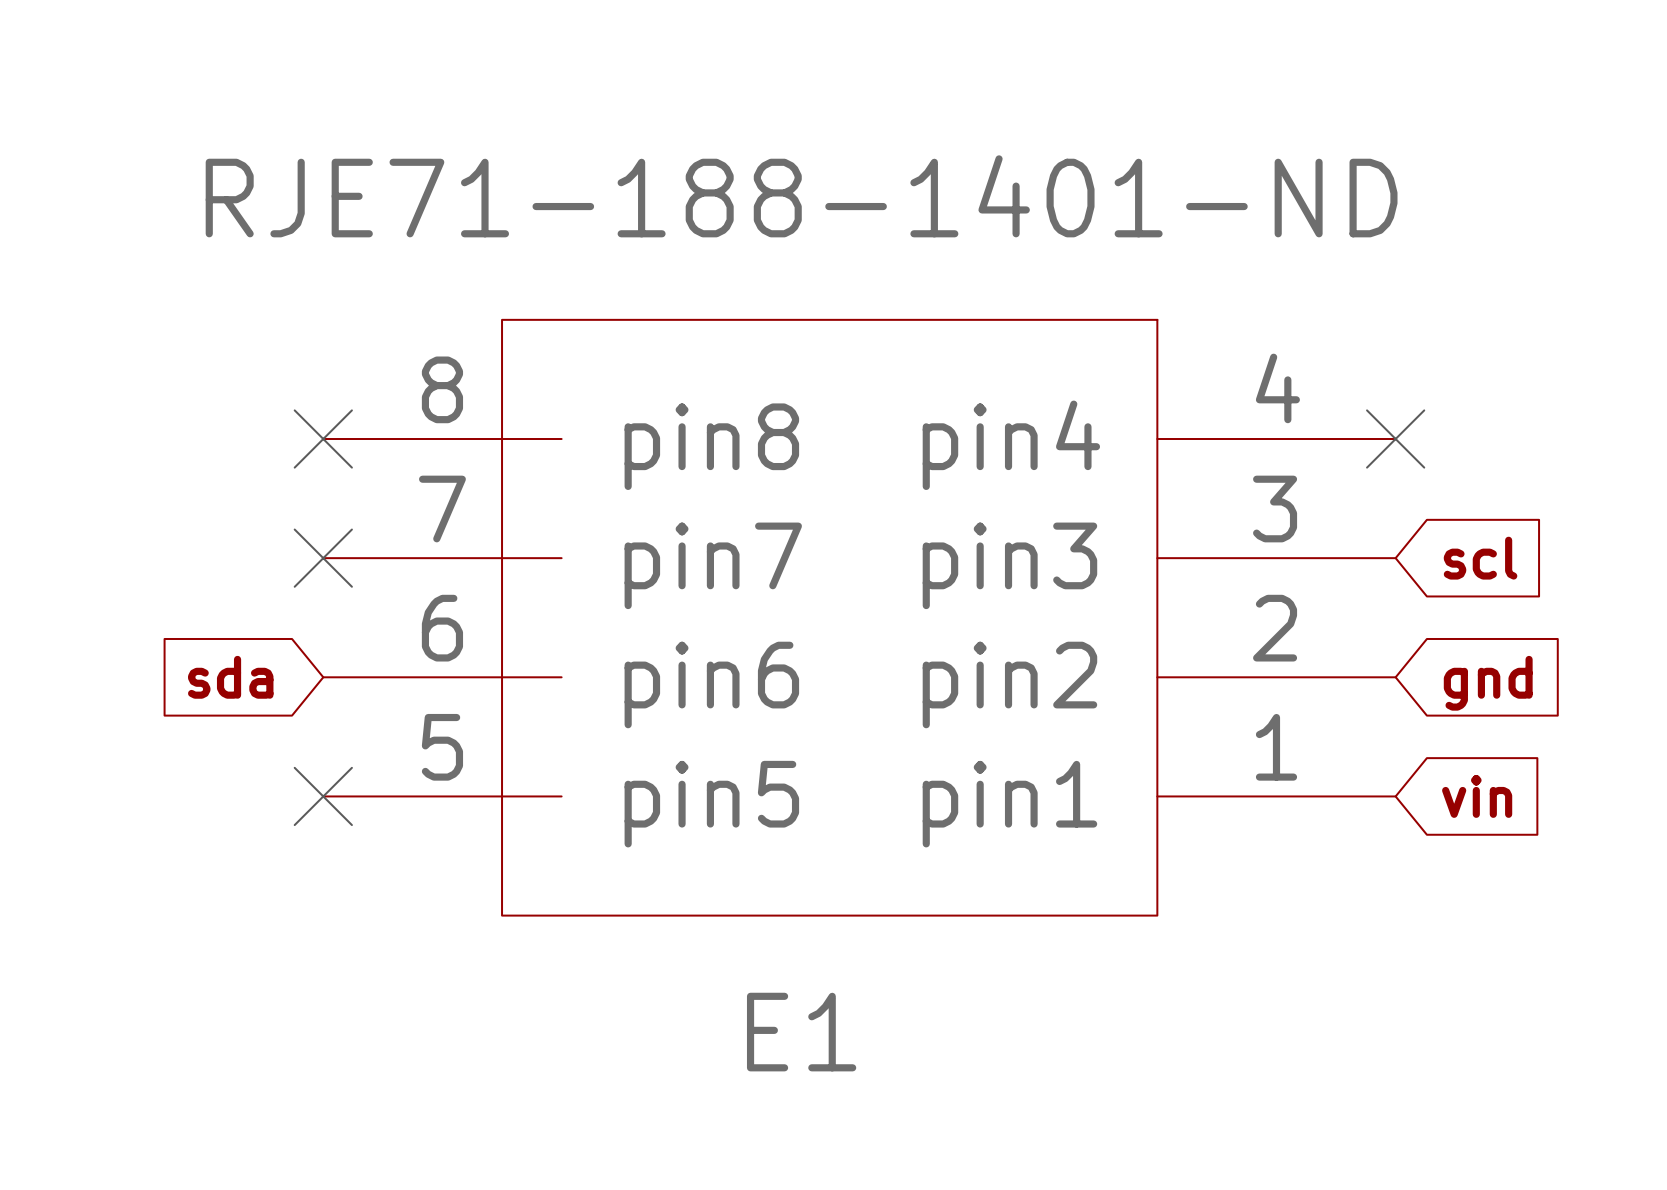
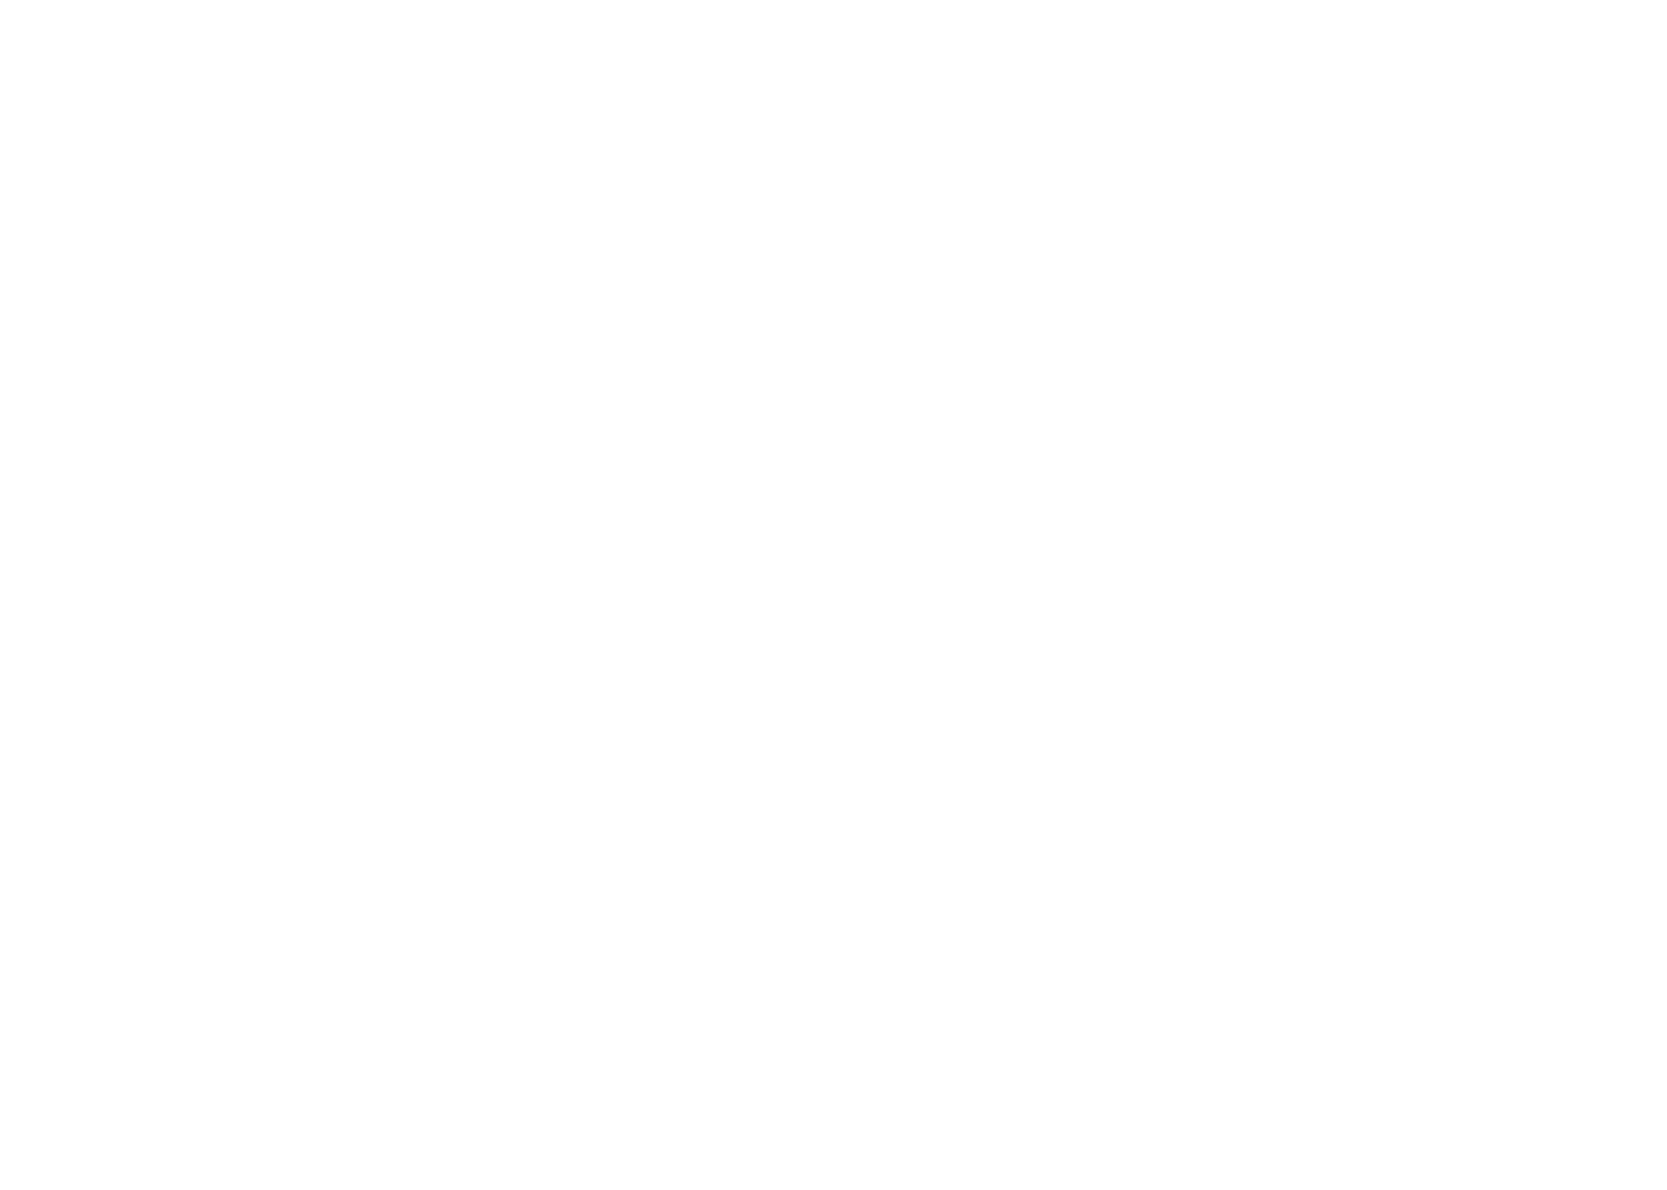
no-connect mark: (323, 439) -> none
no-connect mark: (1395, 439) -> none
no-connect mark: (323, 558) -> none
global label: scl (1480, 558) -> none
E1: RJE71-188-1401-ND (859, 617) -> none
global label: sda (230, 677) -> none
global label: gnd (1488, 683) -> none
no-connect mark: (323, 796) -> none
global label: vin (1477, 796) -> none

